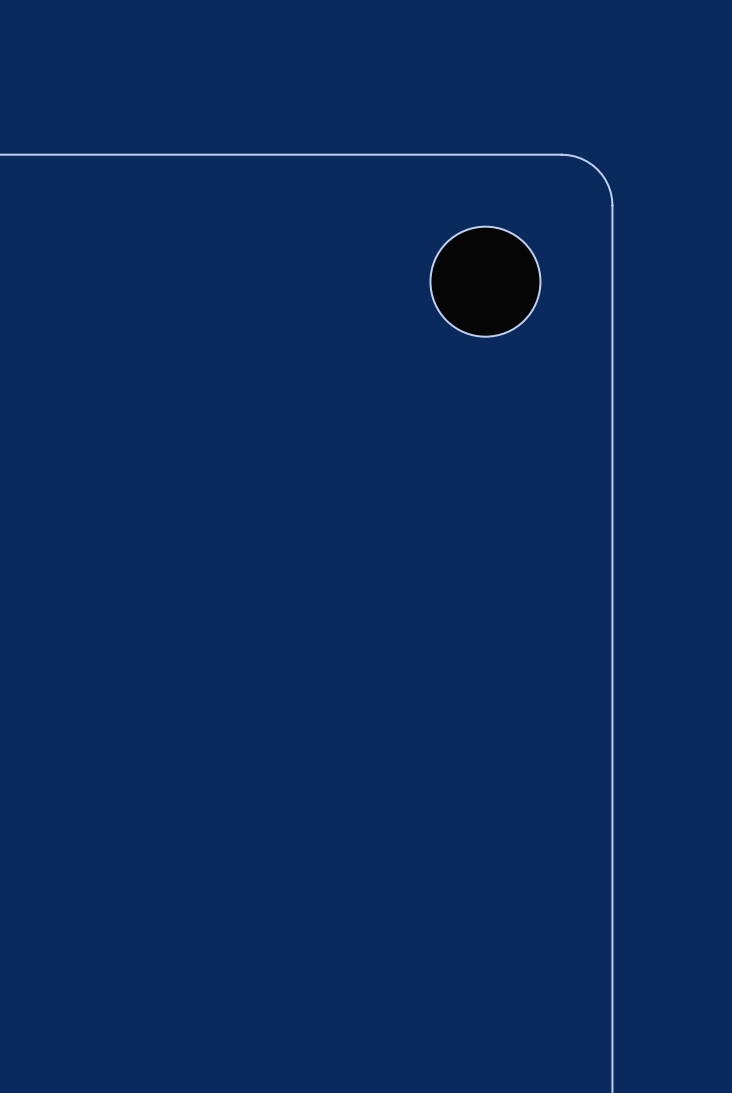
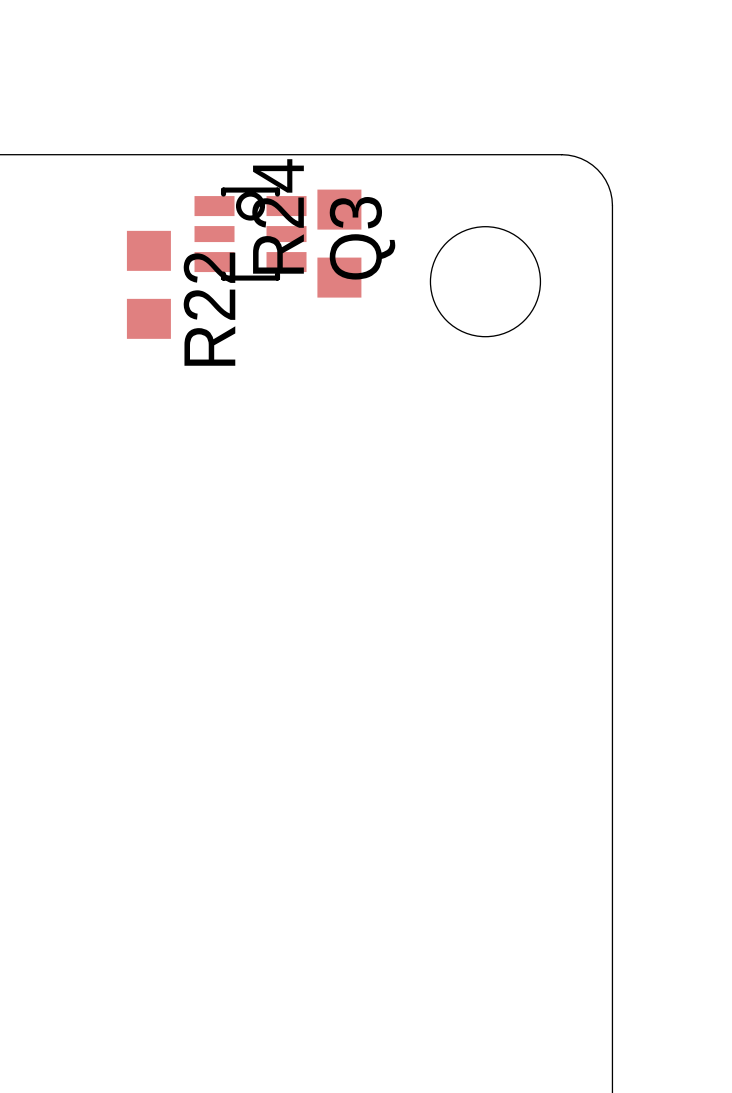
Q3: none -> (250, 234)
R24: none -> (339, 243)
R22: none -> (148, 284)

